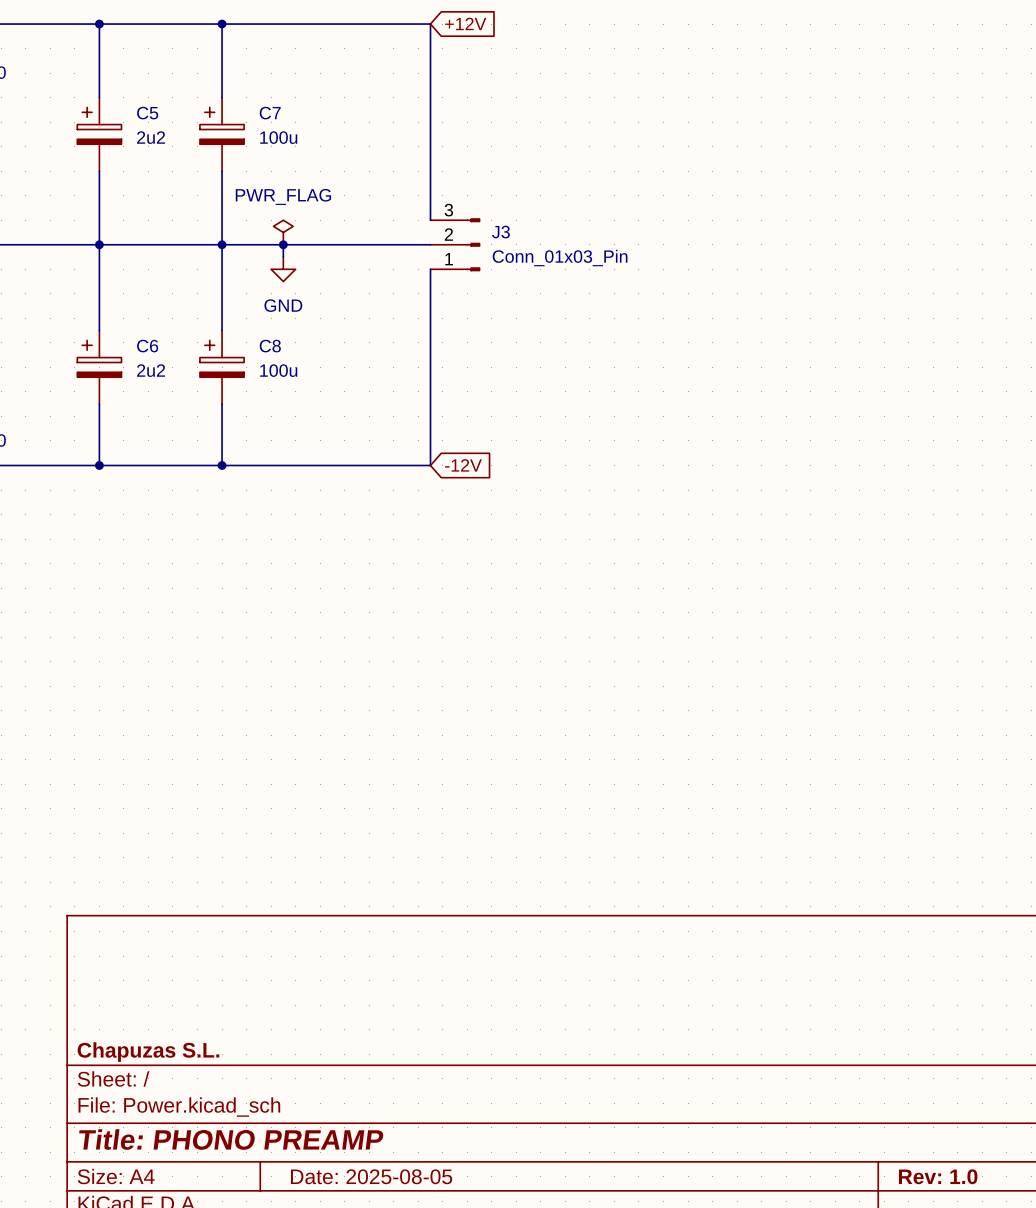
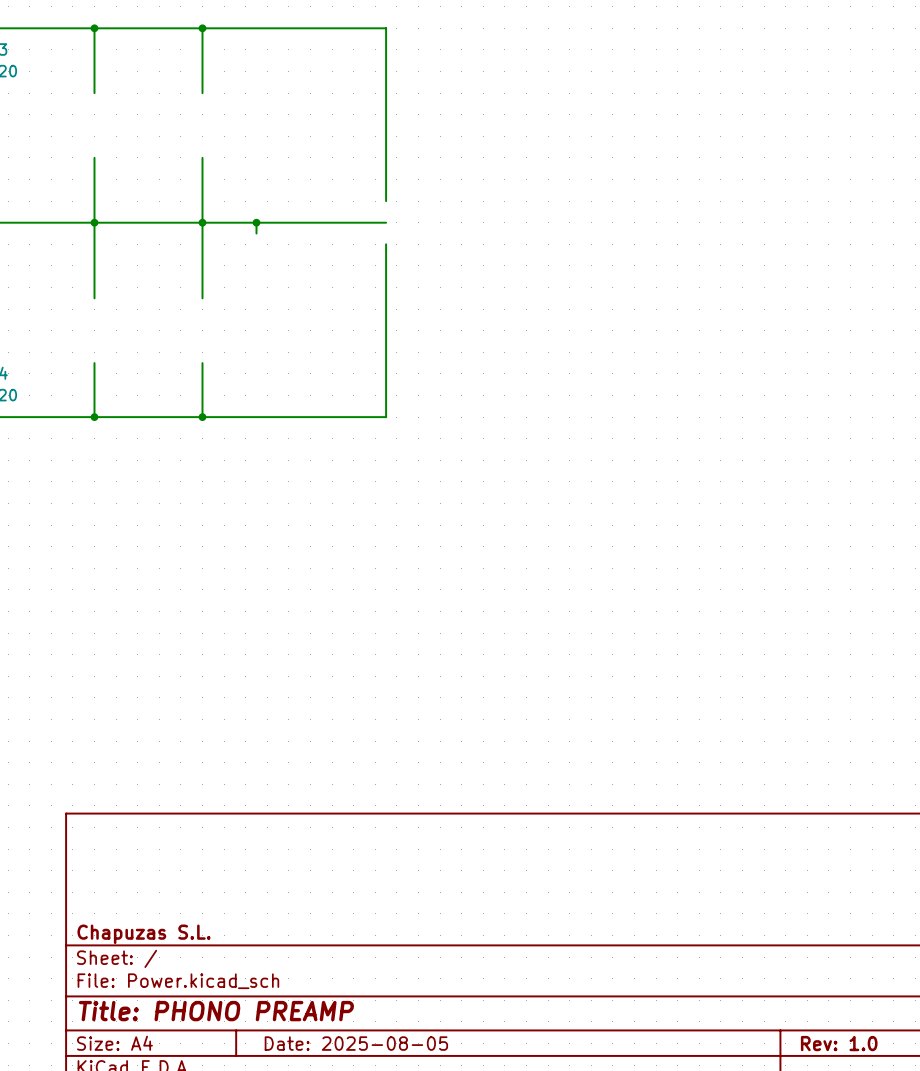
global label: +12V (465, 23) -> none
C5: 2u2 (99, 134) -> none
C7: 100u (222, 134) -> none
power symbol: PWR_FLAG (283, 232) -> none
J3: Conn_01x03_Pin (455, 244) -> none
power symbol: GND (283, 269) -> none
C6: 2u2 (99, 367) -> none
C8: 100u (222, 367) -> none
global label: -12V (463, 465) -> none

